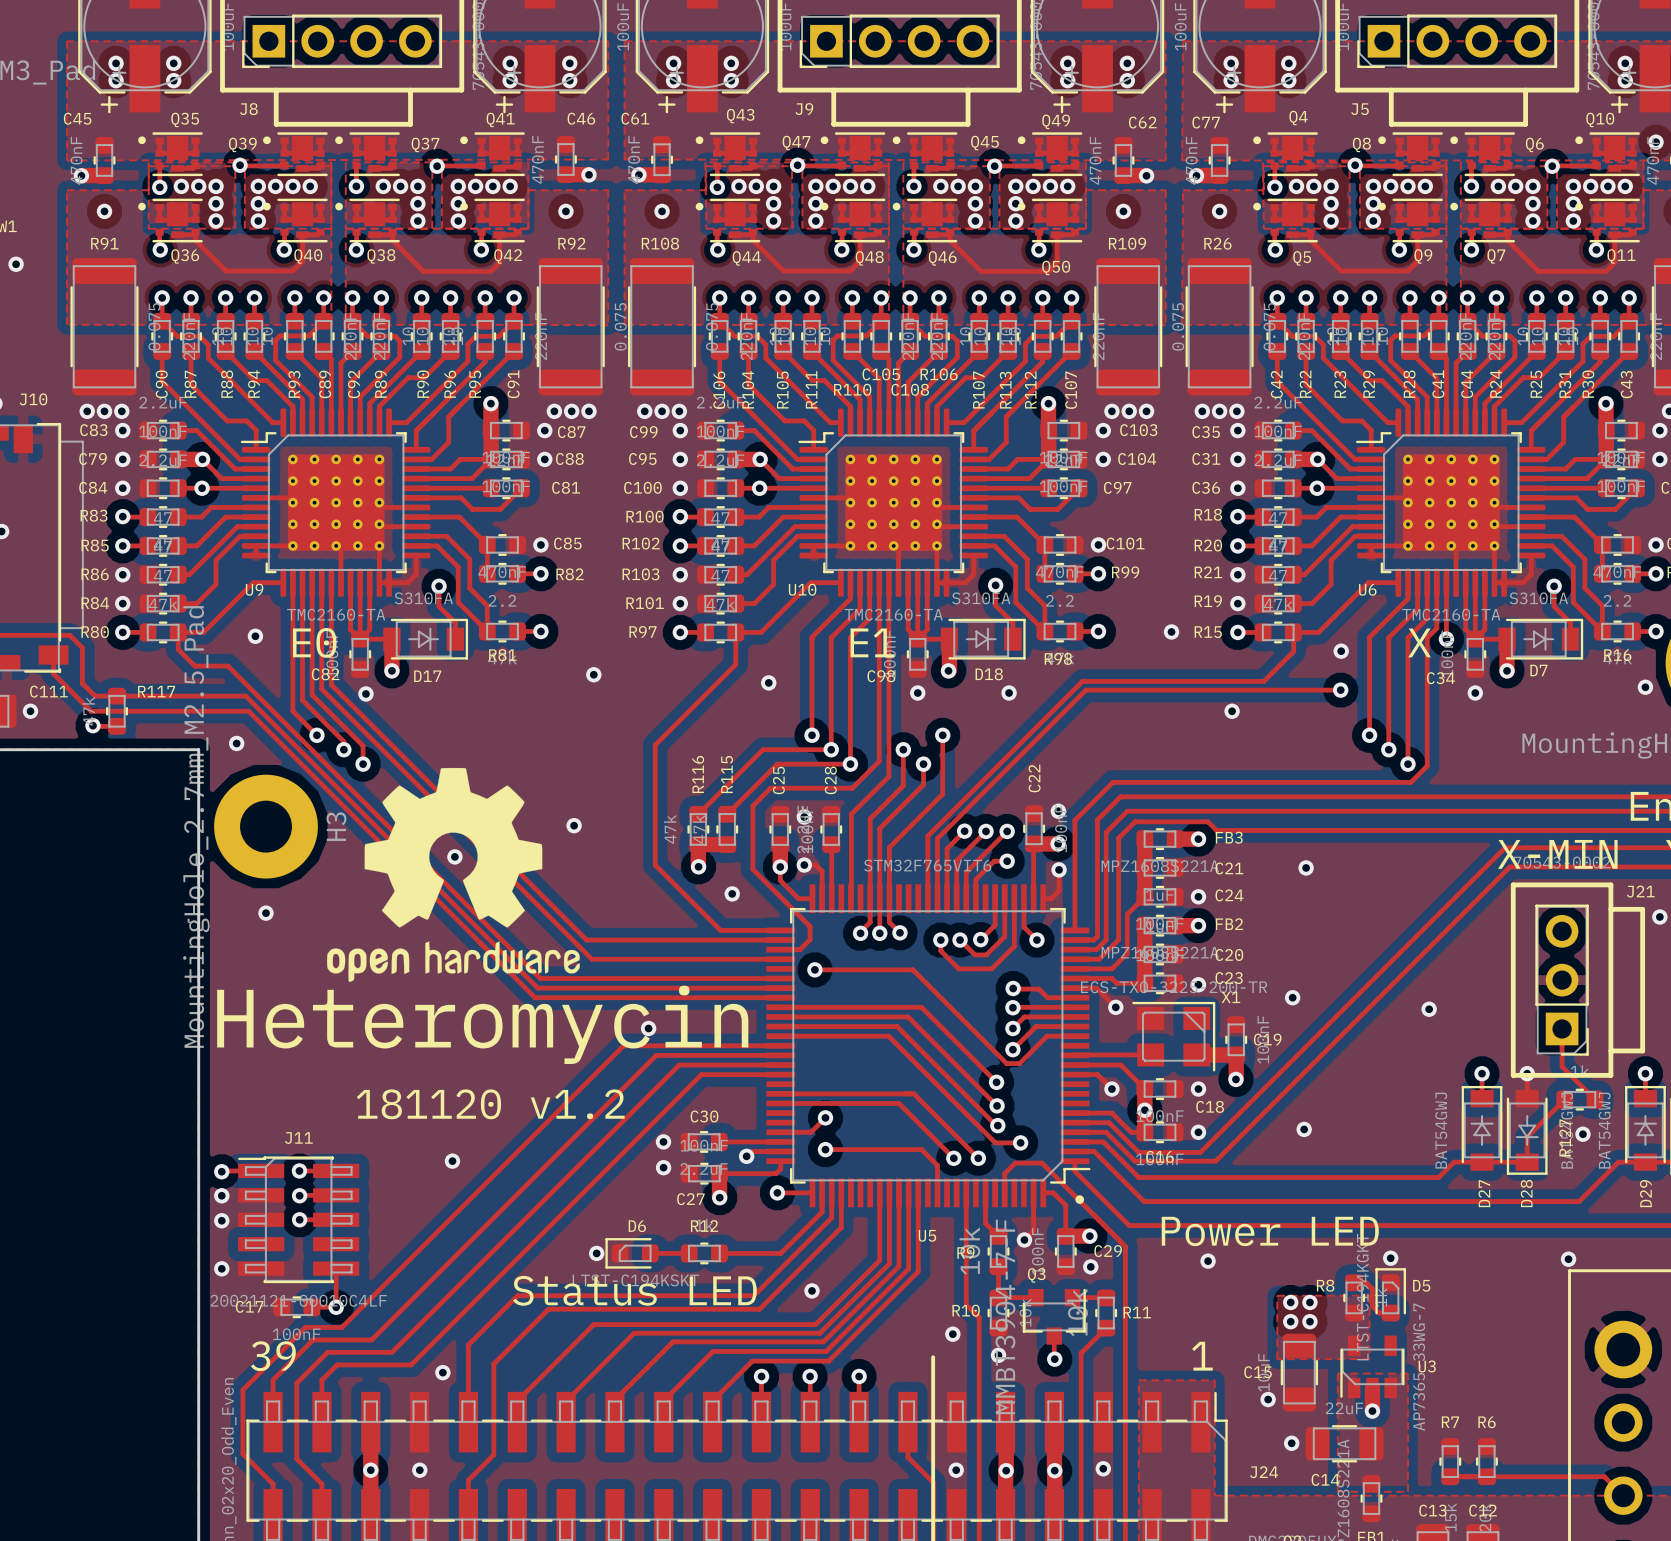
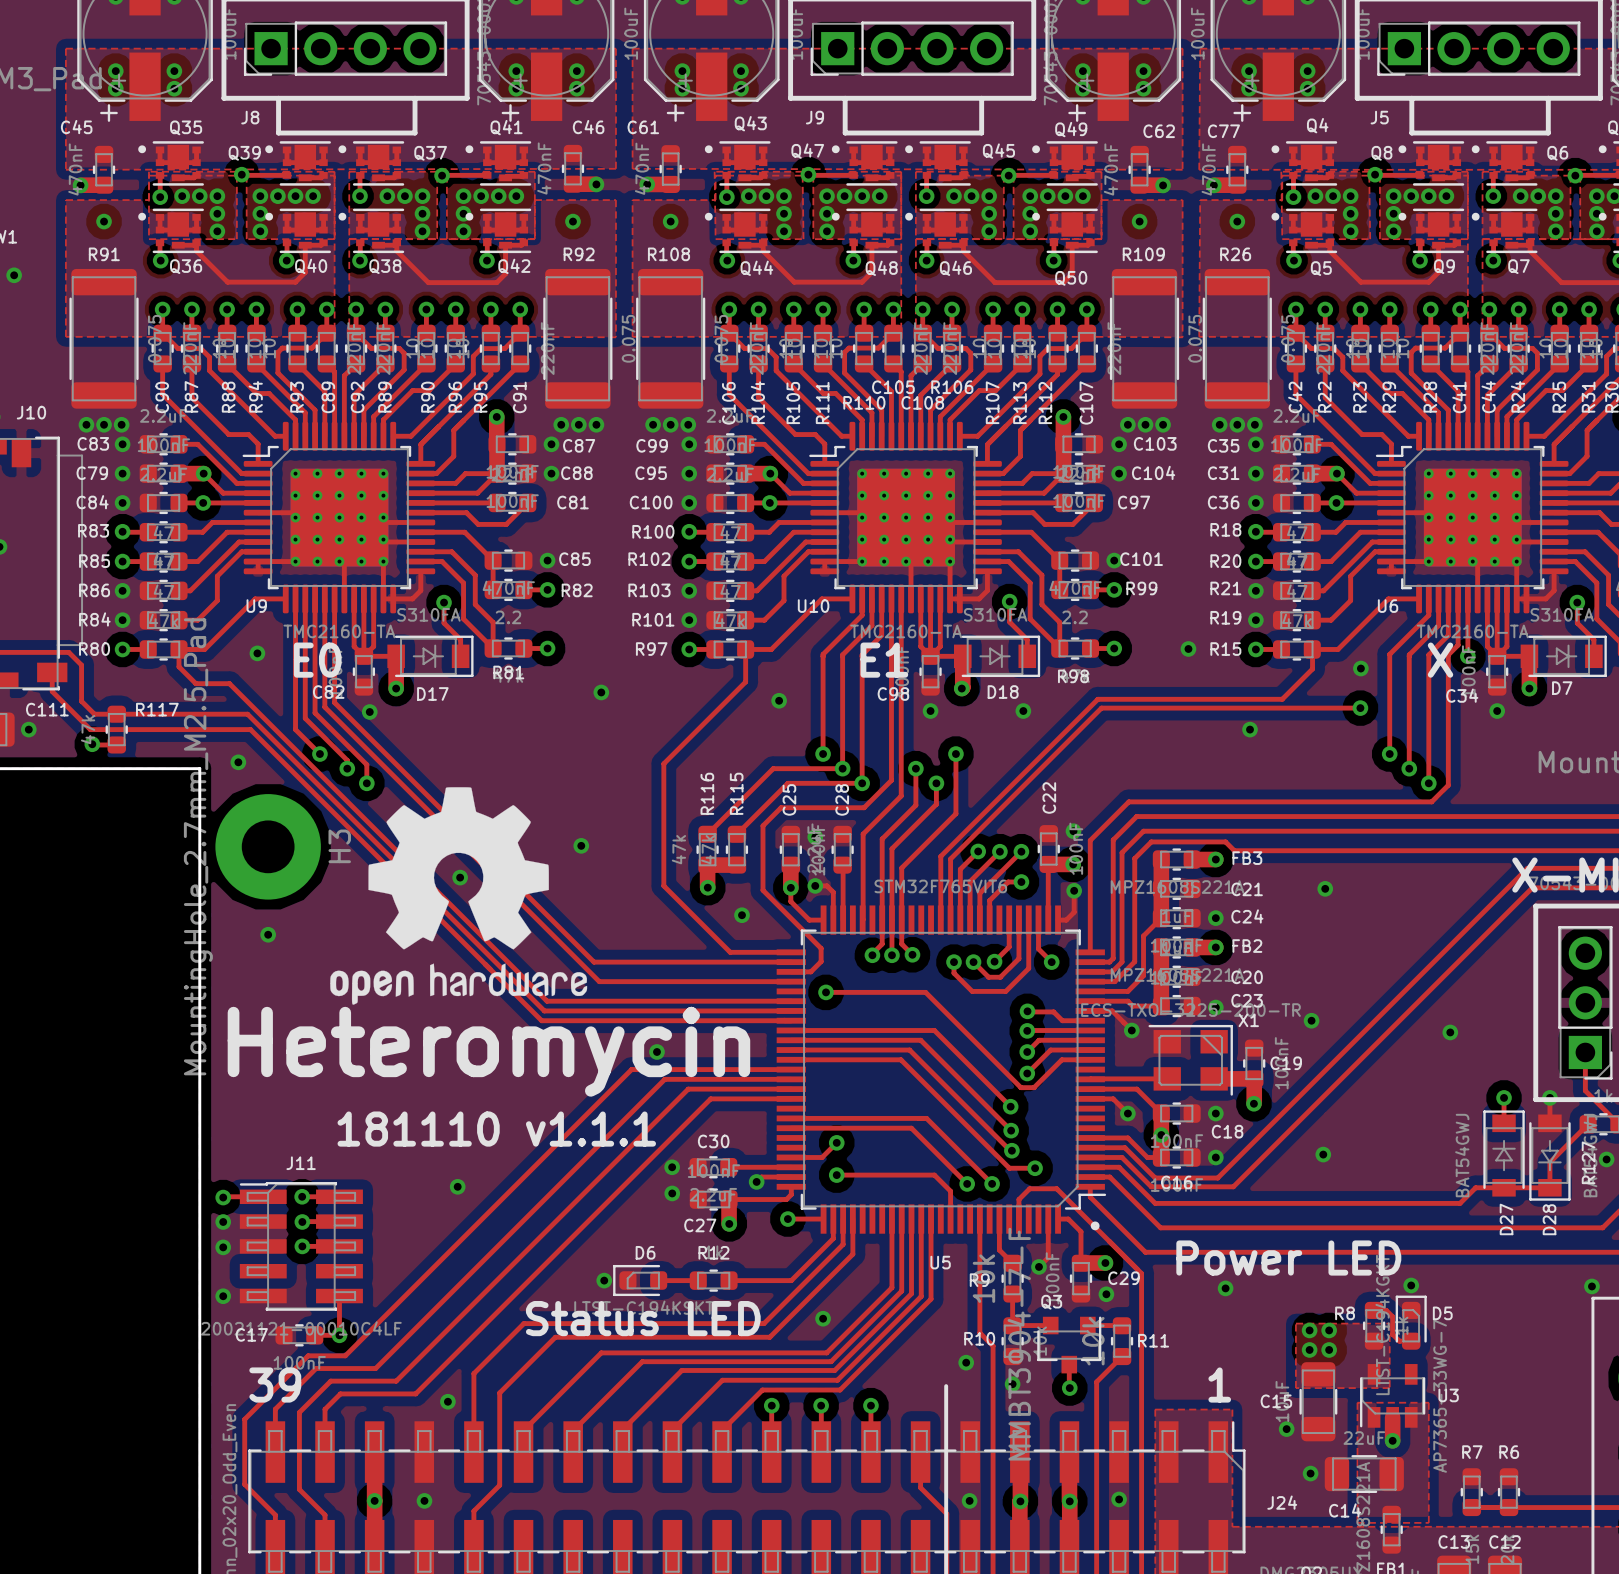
text: 181120 v1.2 (490, 1104) -> 181110 v1.1.1 (496, 1129)

